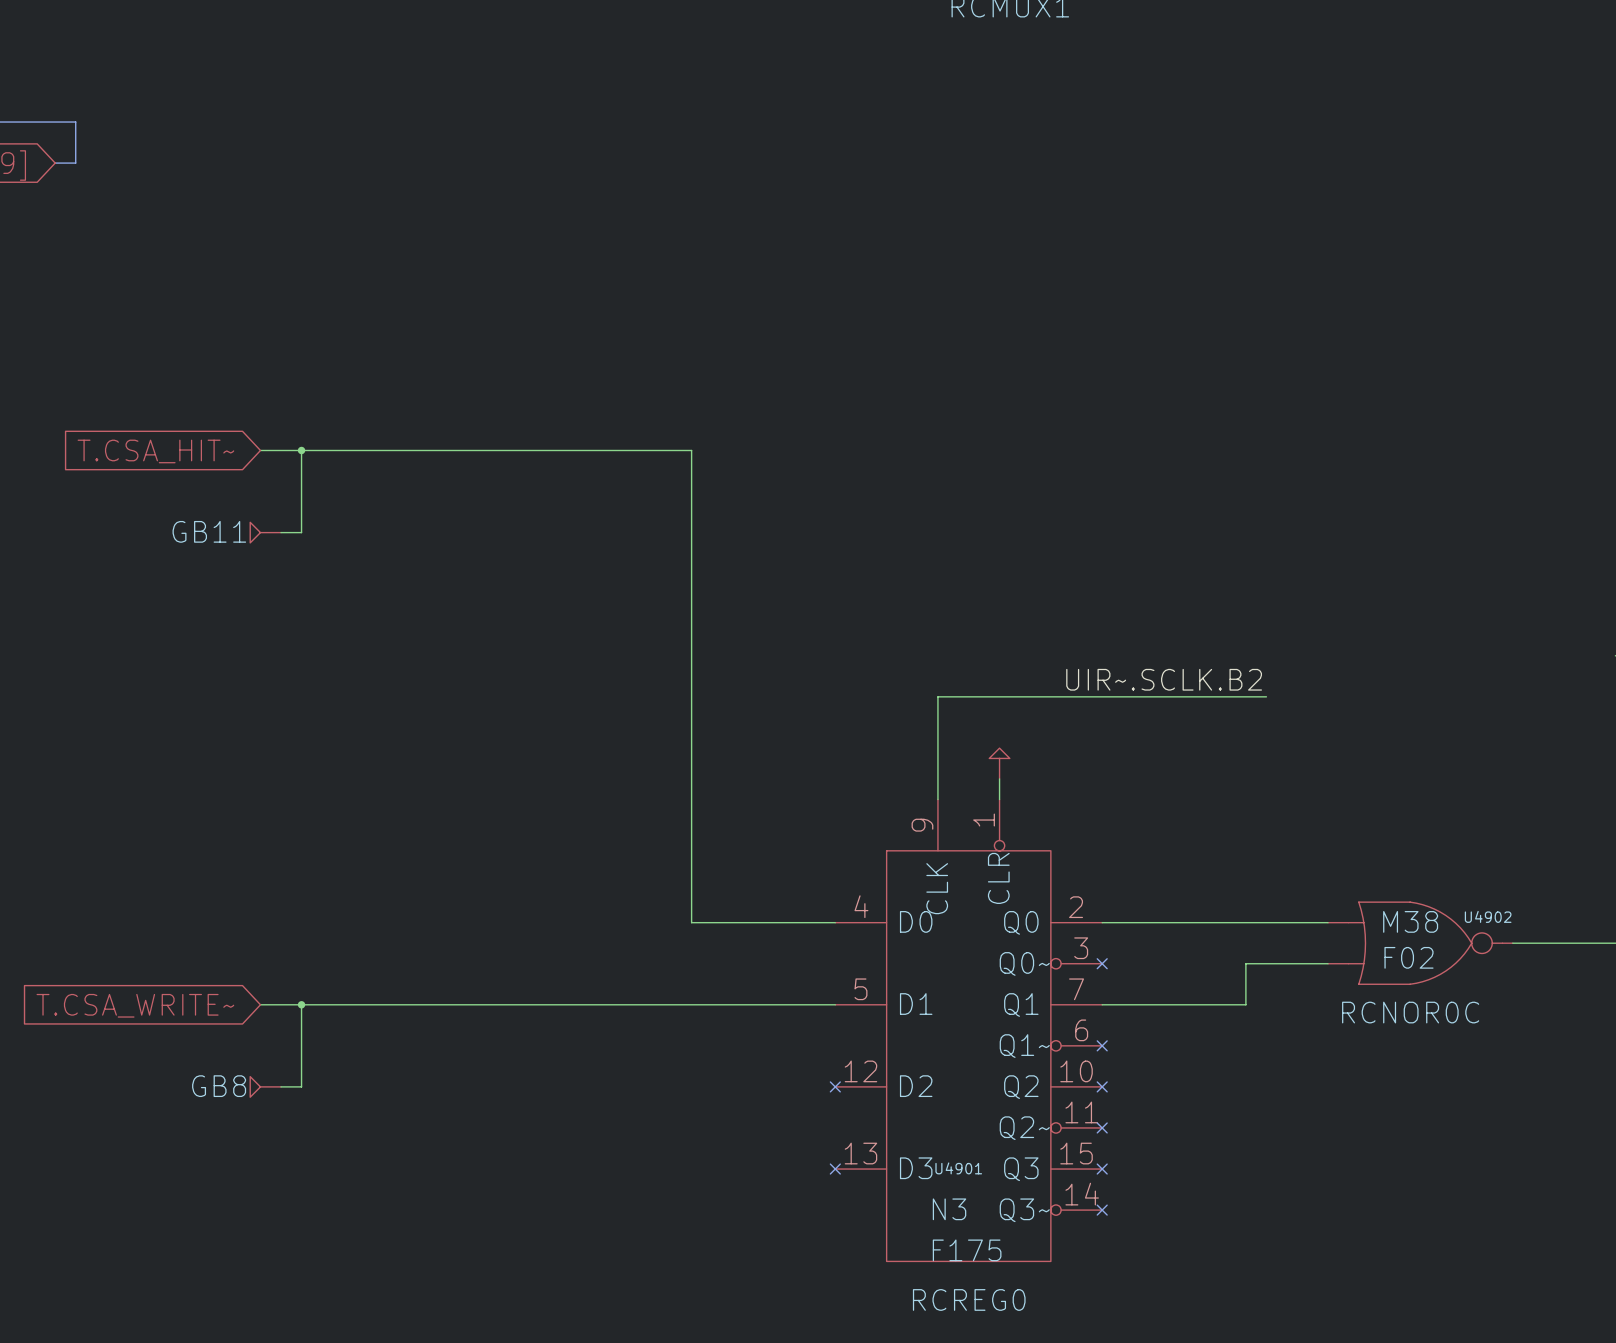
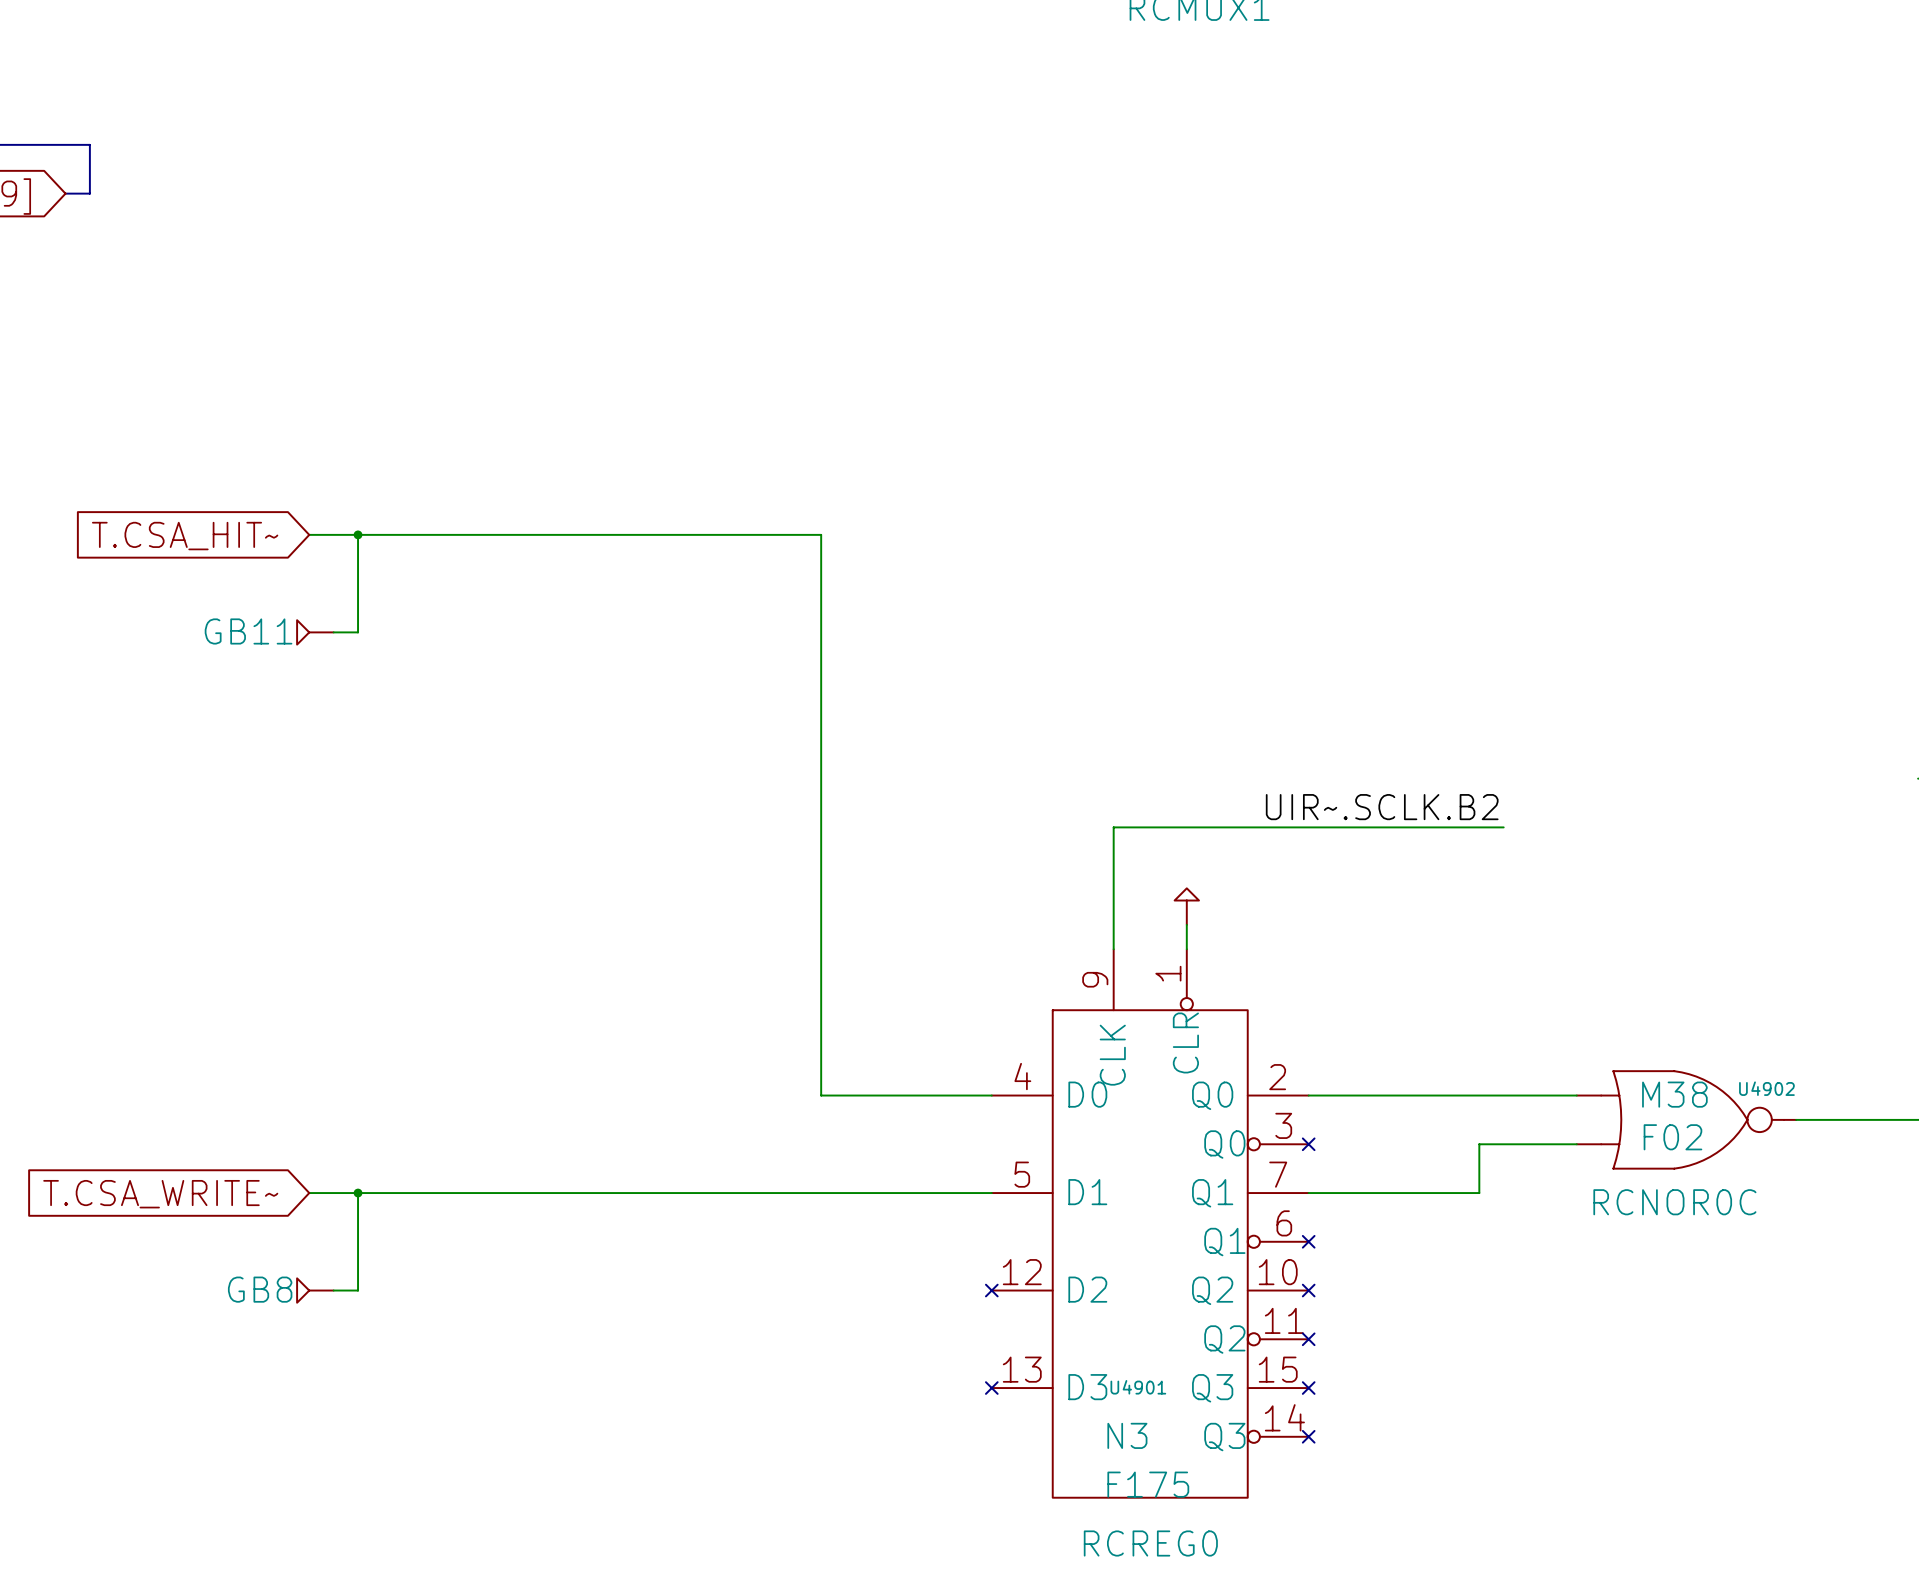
U4901 pin name: Q0~ (1024, 963) -> Q0 (1224, 1144)
U4901 pin name: Q1~ (1024, 1046) -> Q1 (1224, 1242)
U4901 pin name: Q2~ (1024, 1128) -> Q2 (1224, 1339)
U4901 pin name: Q3~ (1024, 1210) -> Q3 (1224, 1437)

